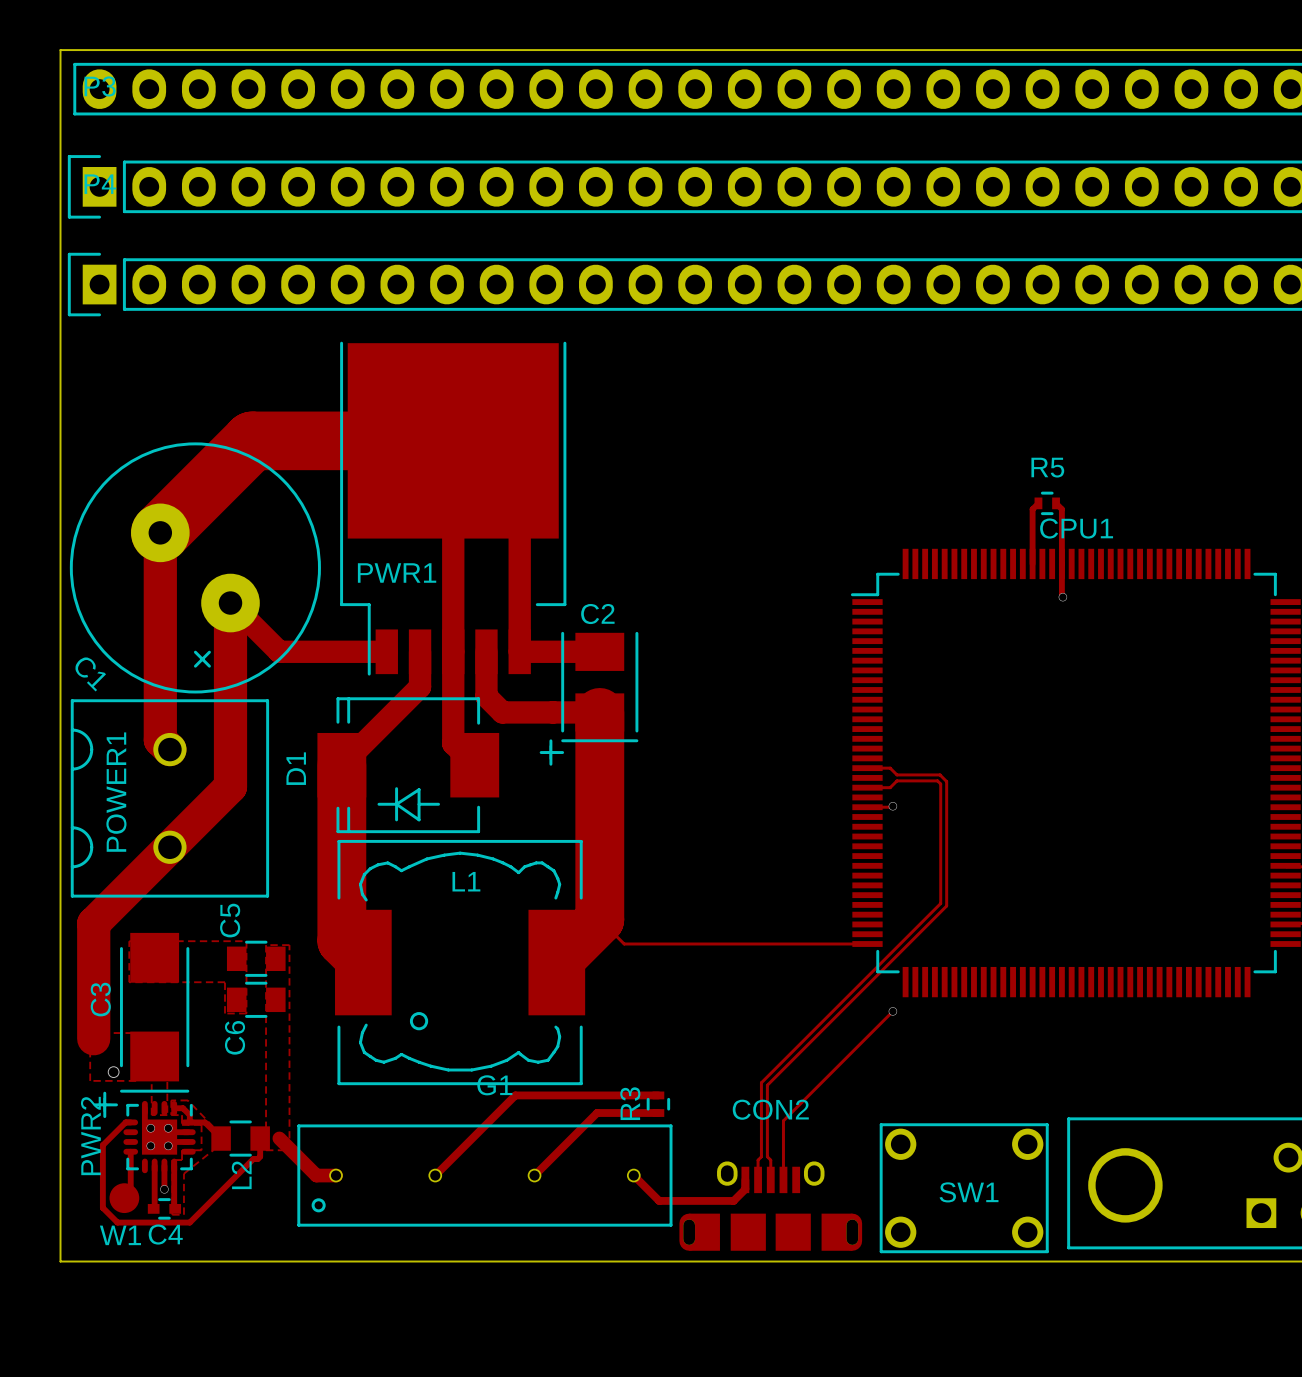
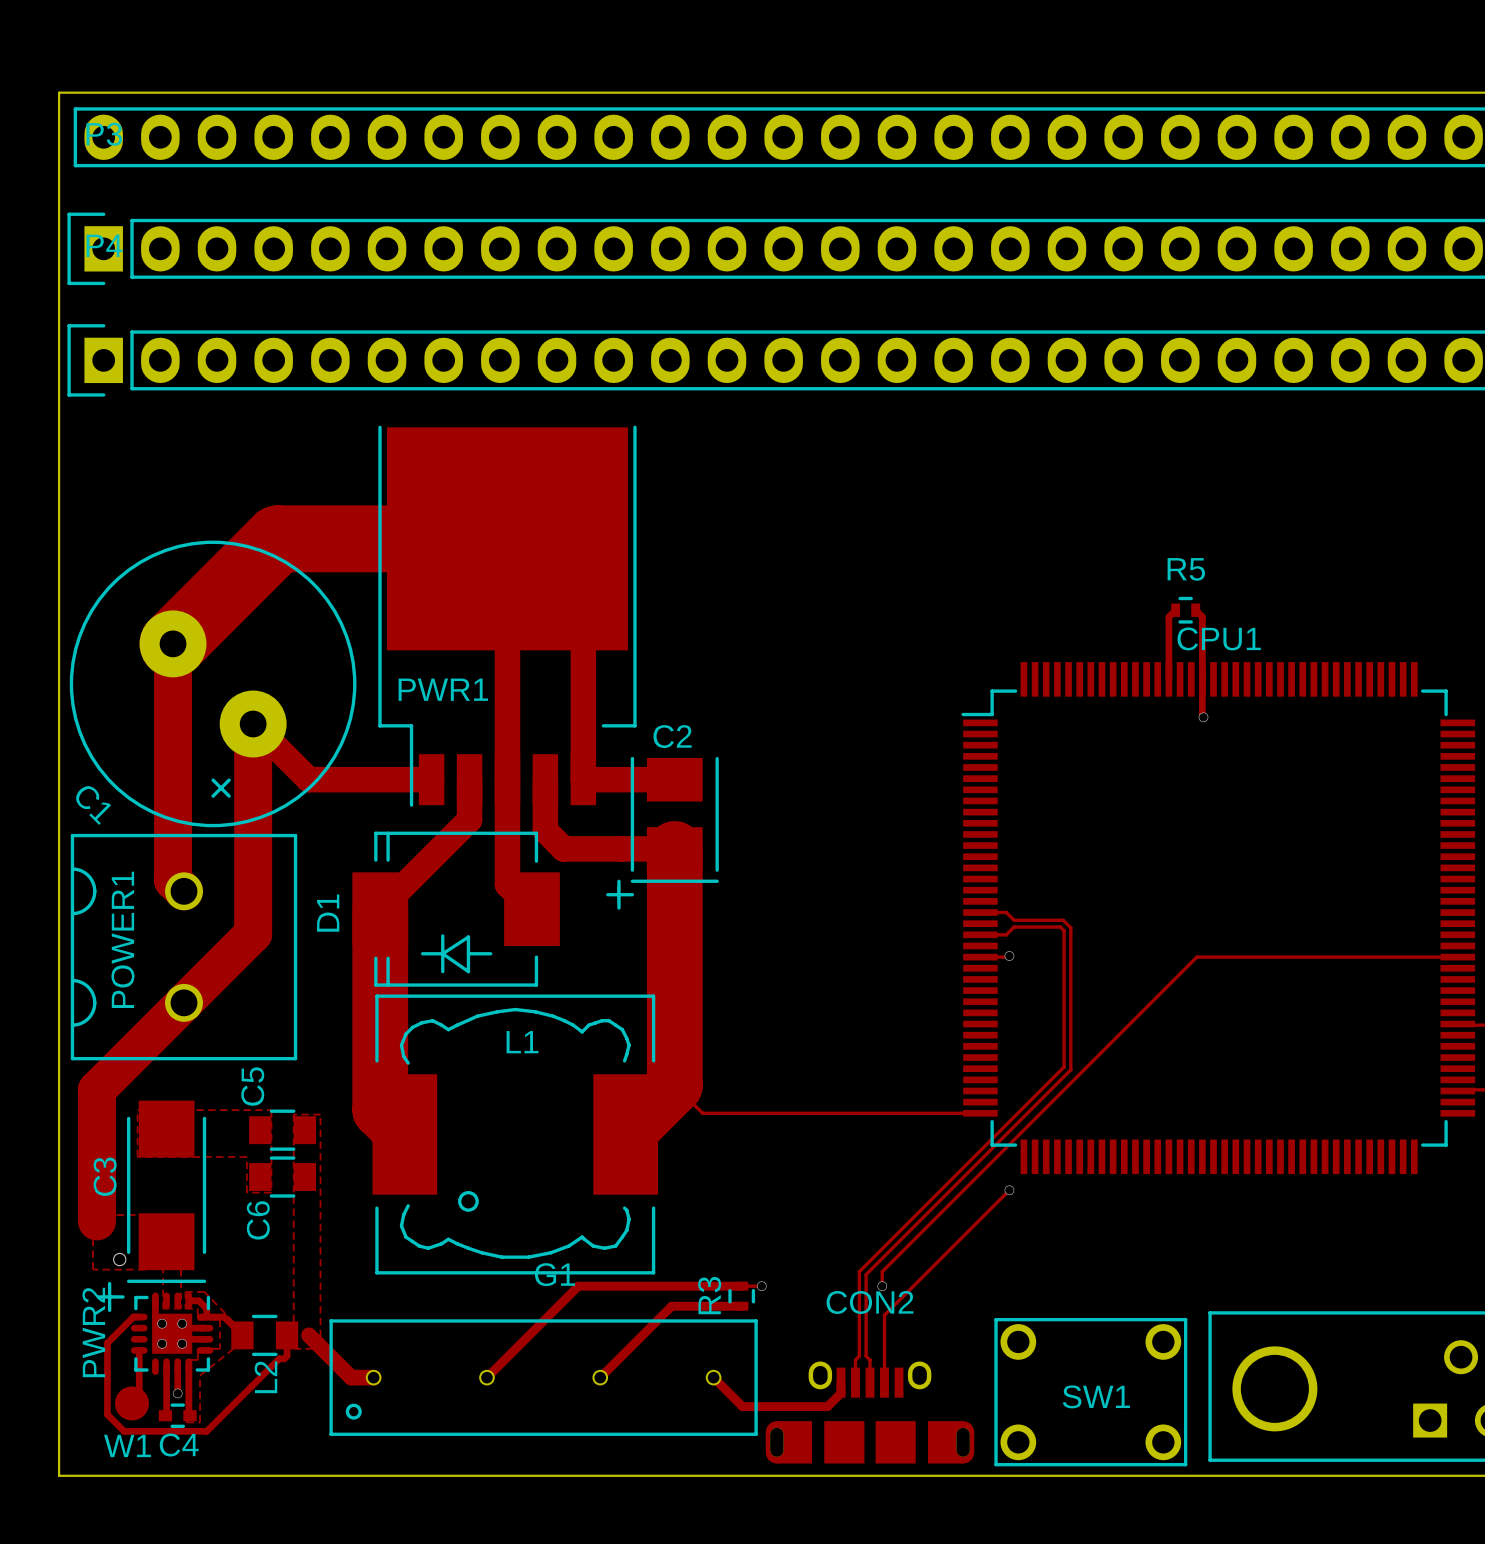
track: none -> (1457, 957) (1196, 957) (882, 1271) (882, 1286)
track: none -> (741, 1286) (761, 1286)
via: none -> (761, 1286)
via: none -> (882, 1286)

